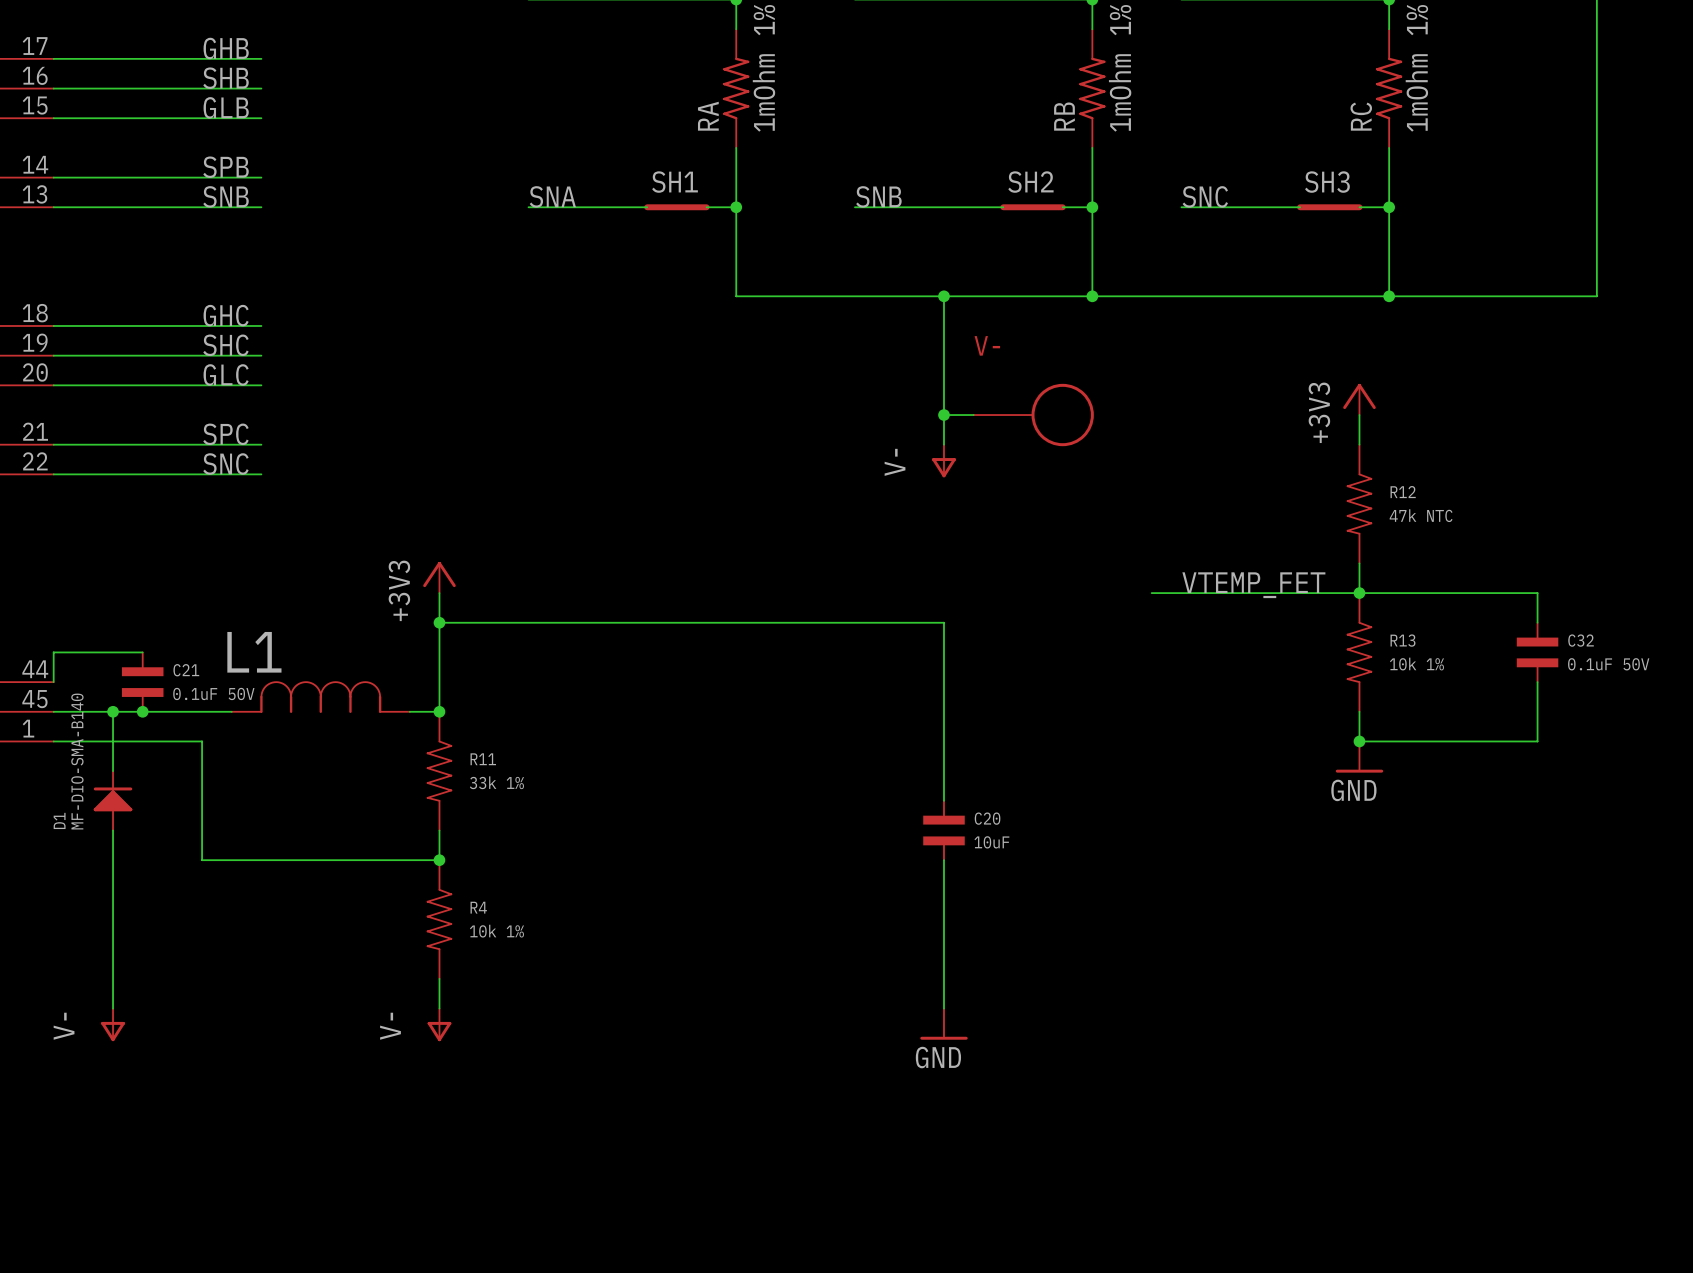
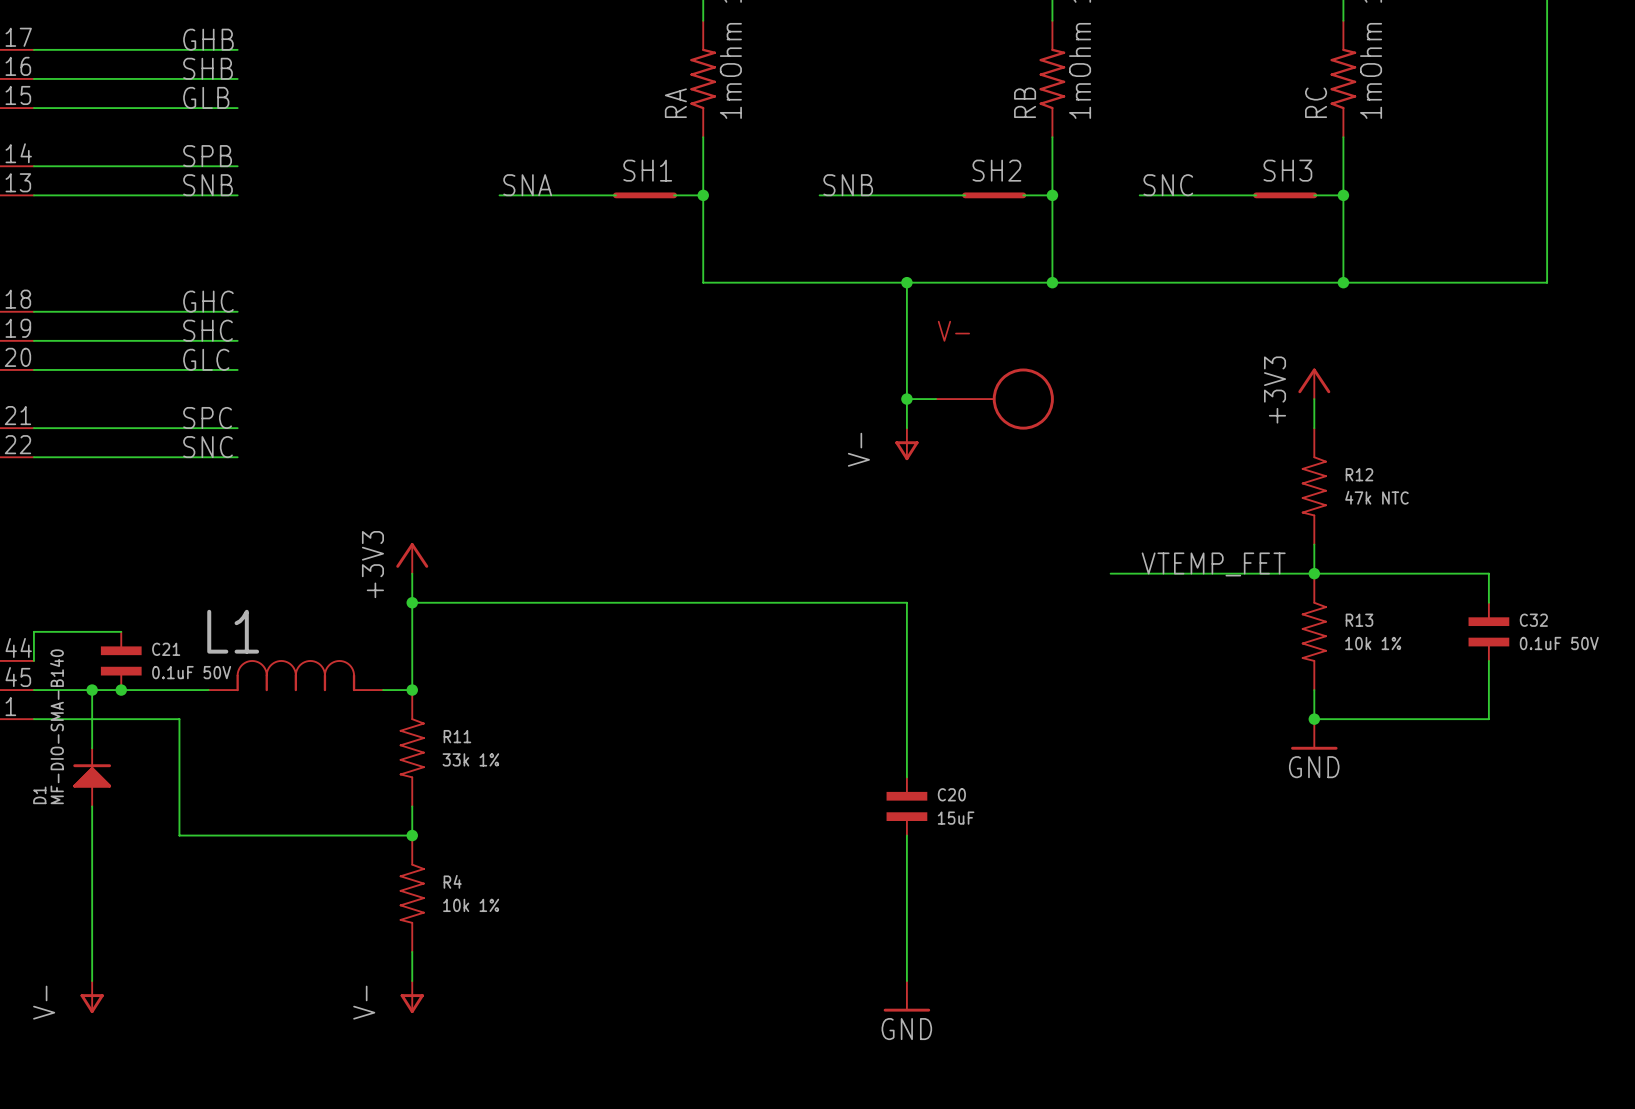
C20 value: 10uF (991, 842) -> 15uF (956, 818)

